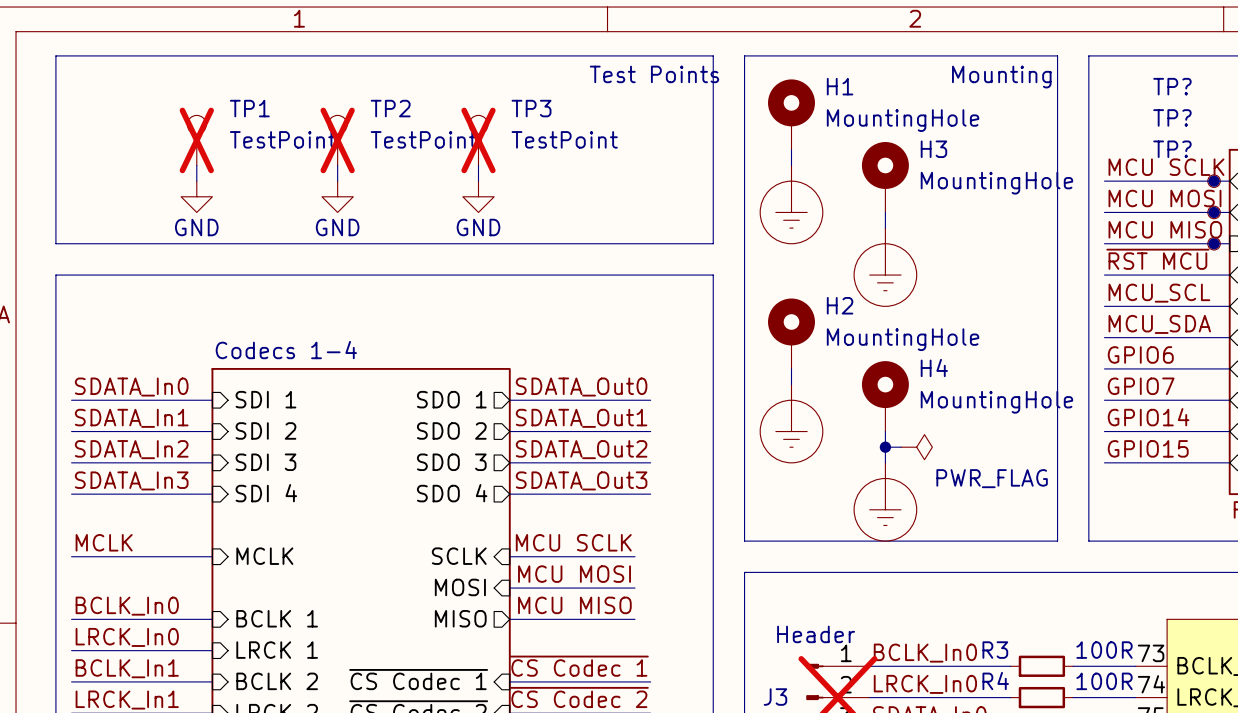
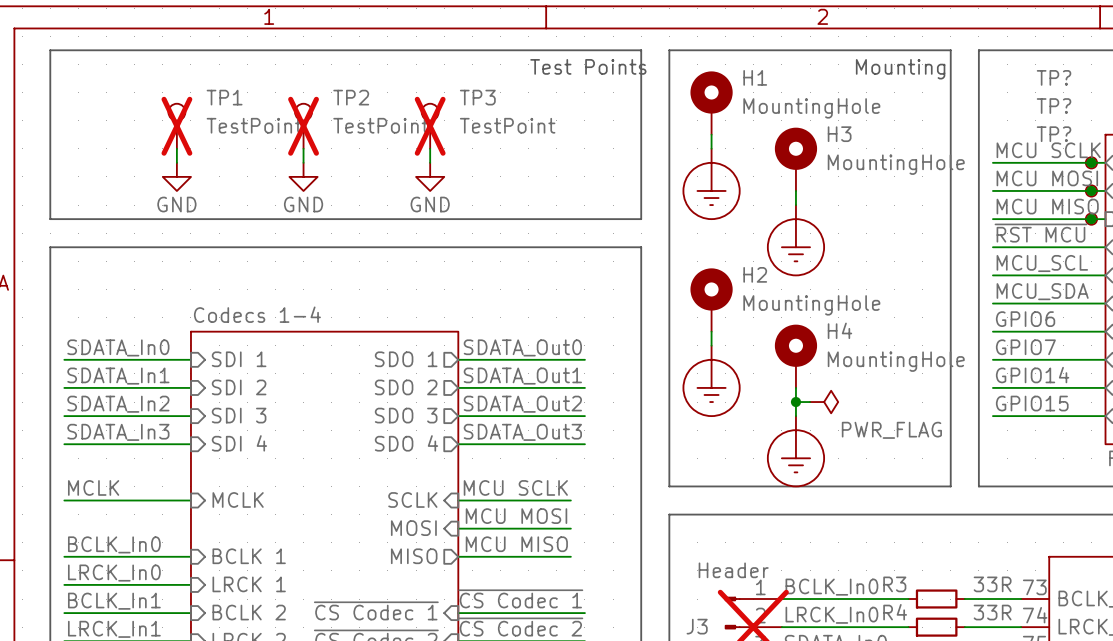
R3 value: 100R (1104, 650) -> 33R (992, 584)
R4 value: 100R (1104, 681) -> 33R (992, 612)

